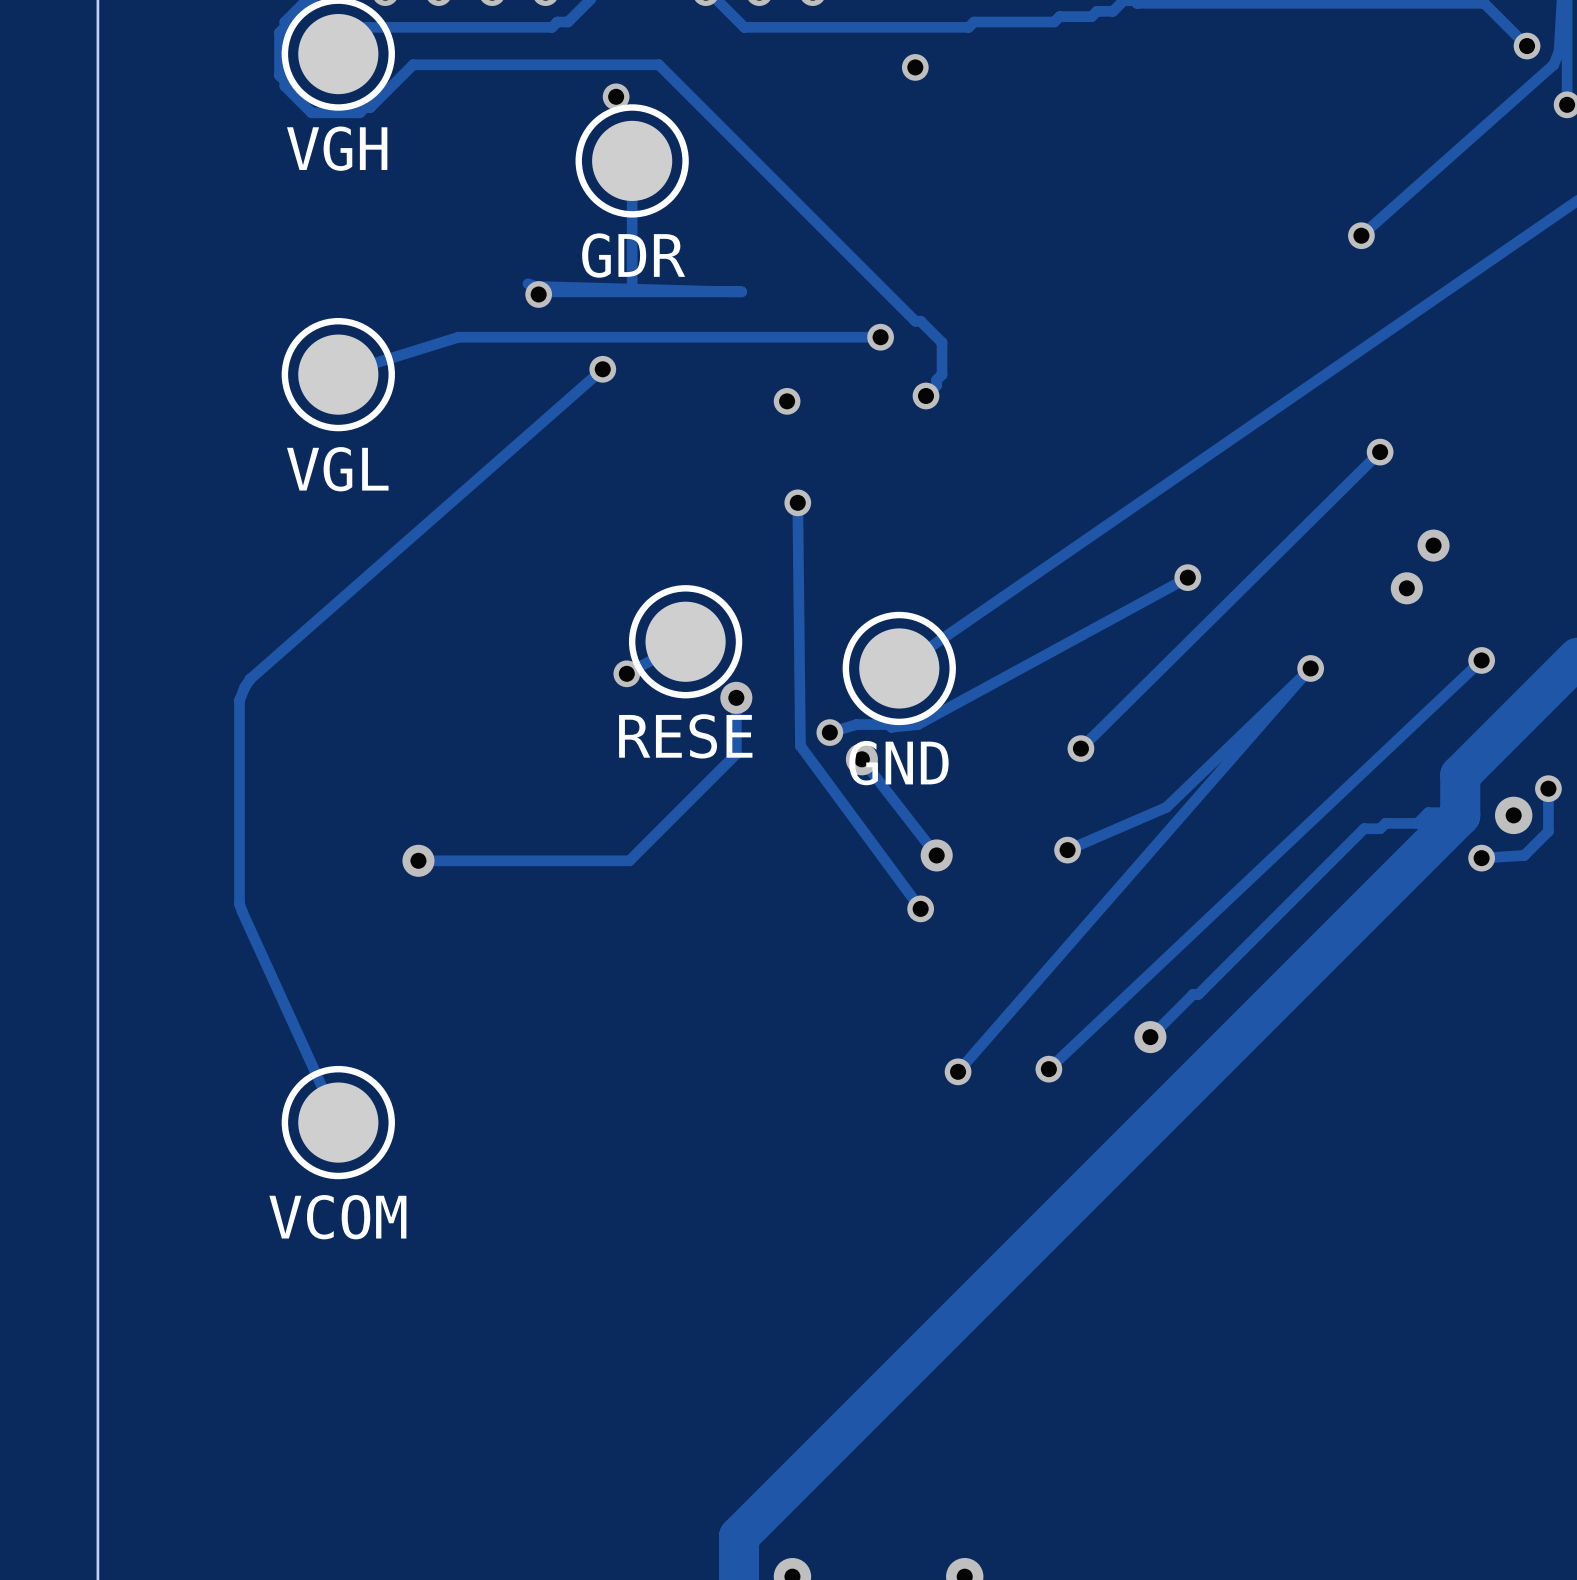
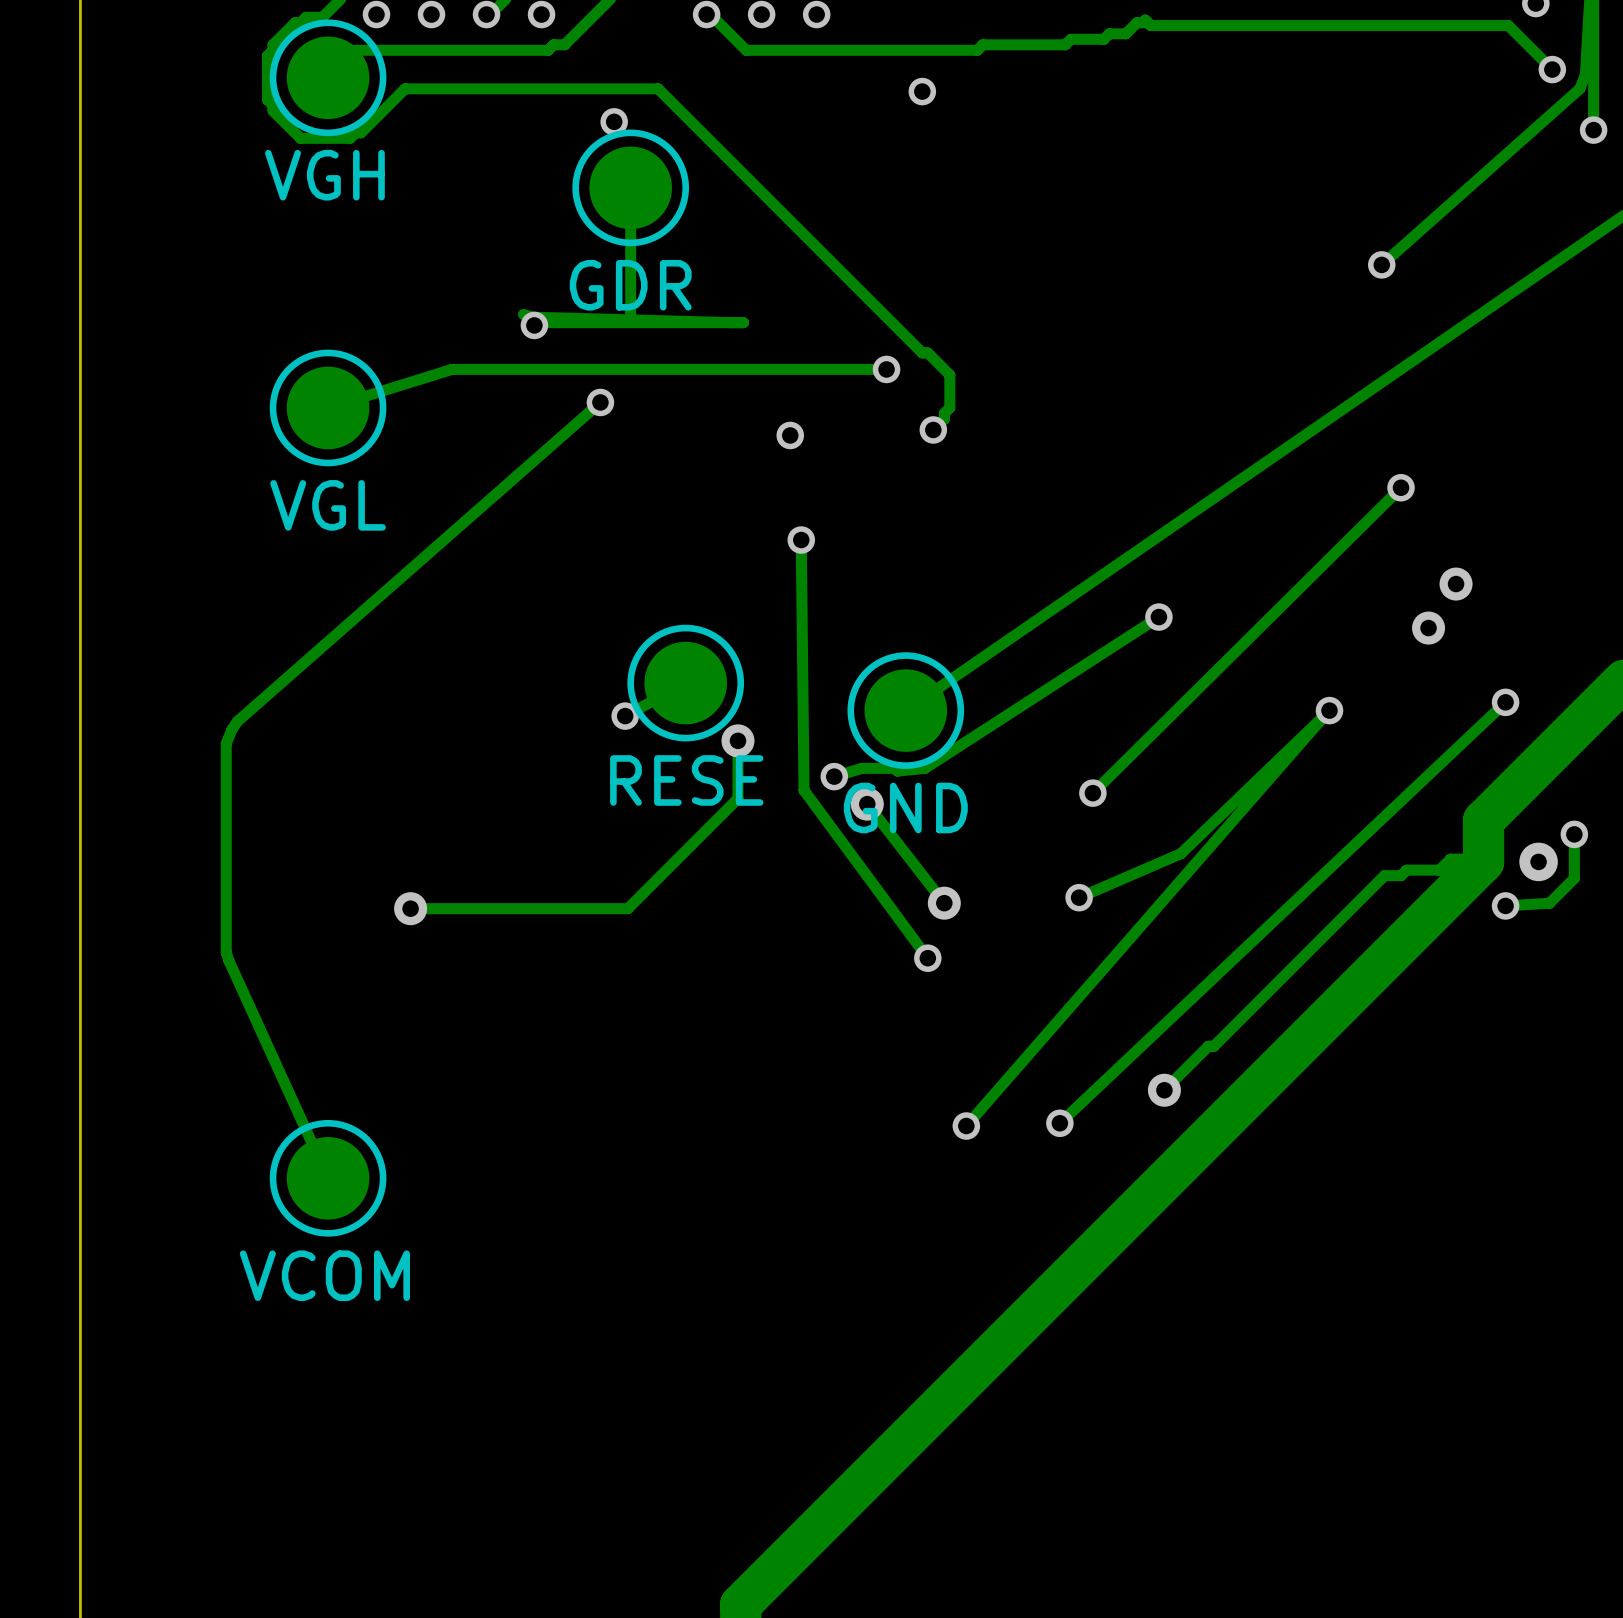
track: (1187, 577) (917, 724) -> (1158, 617) (925, 768)
via position: (1187, 577) -> (1158, 617)

